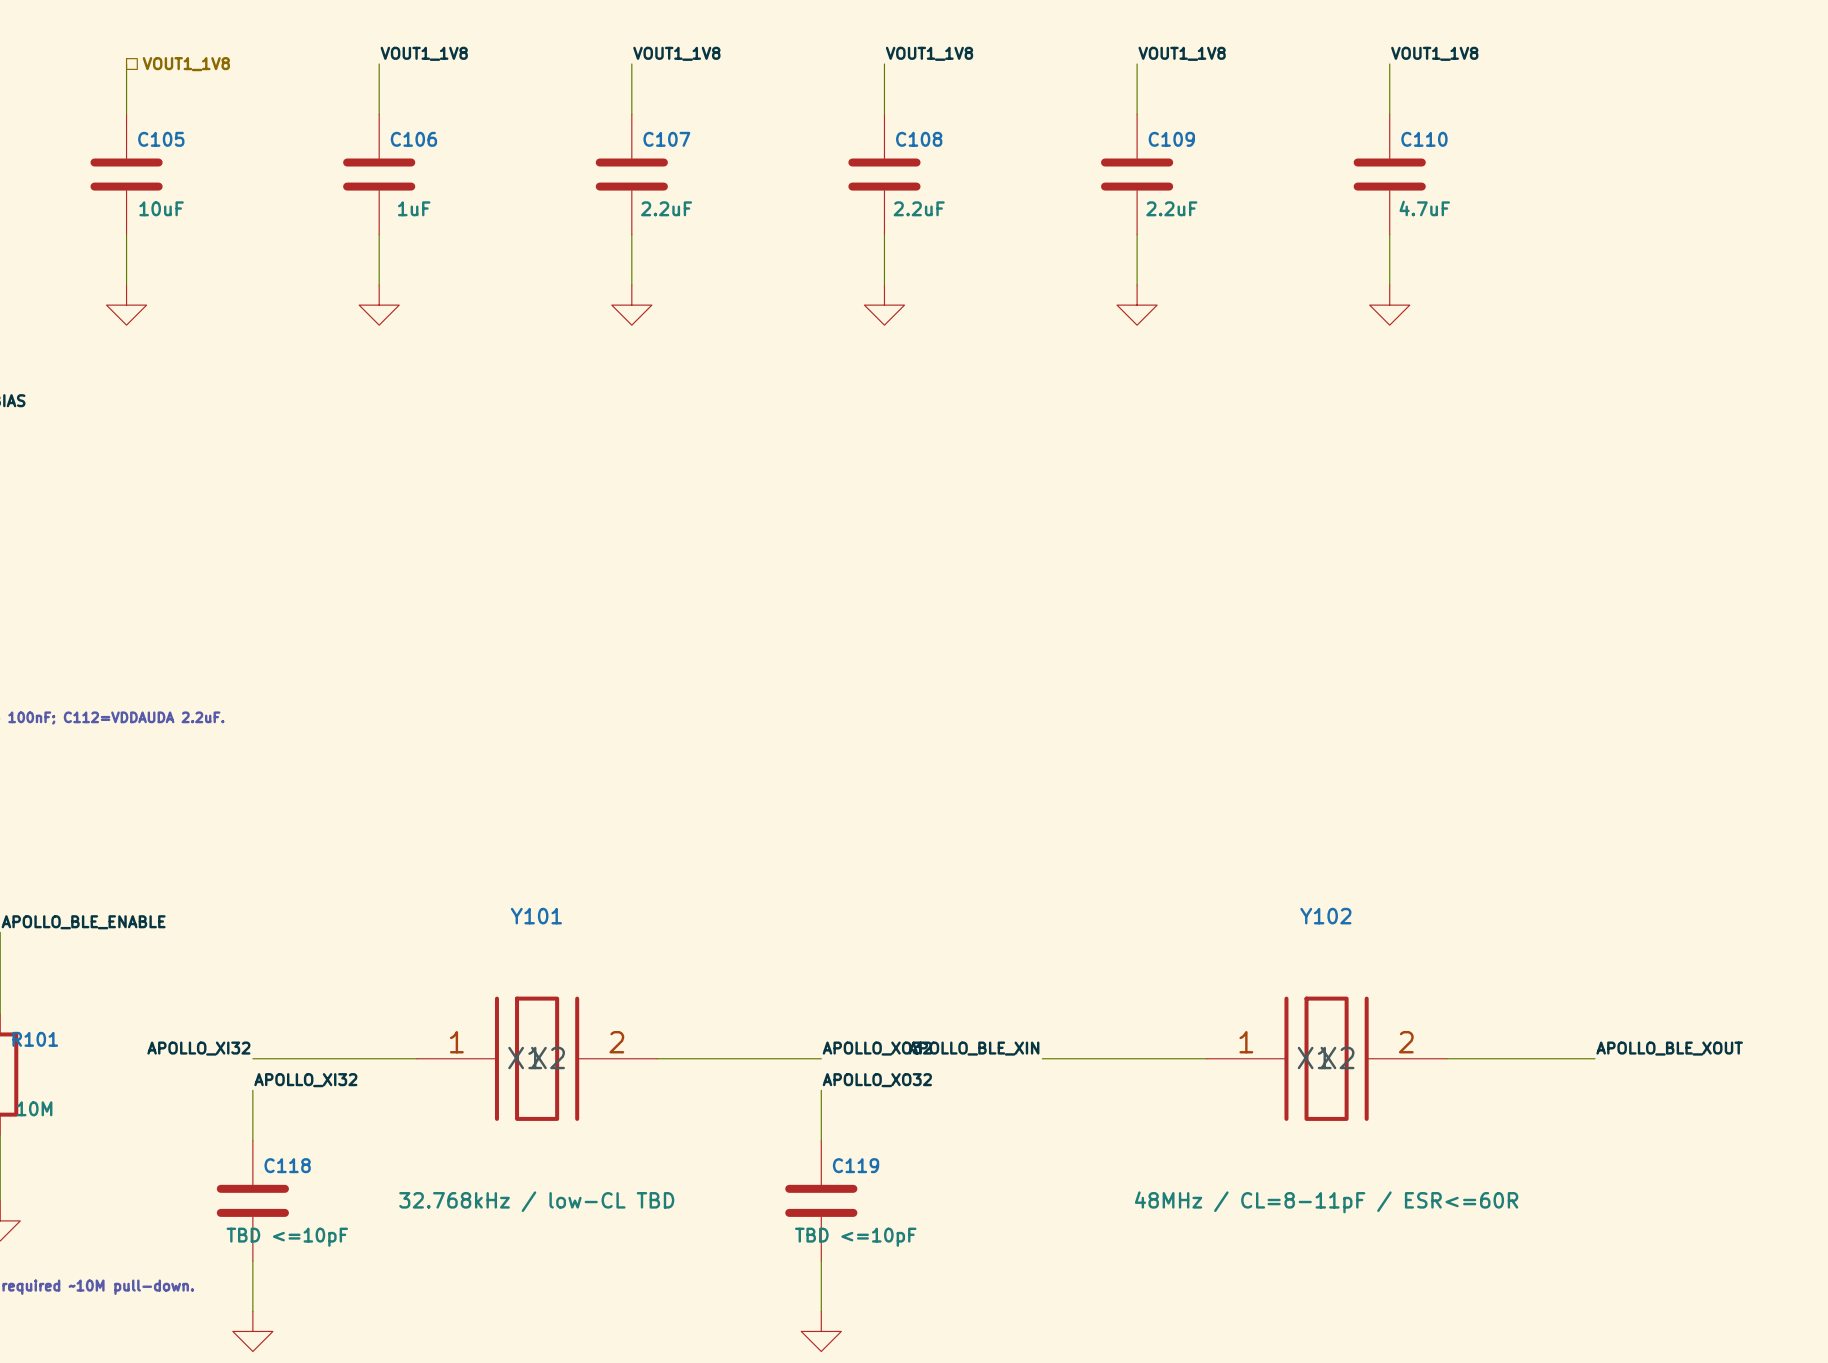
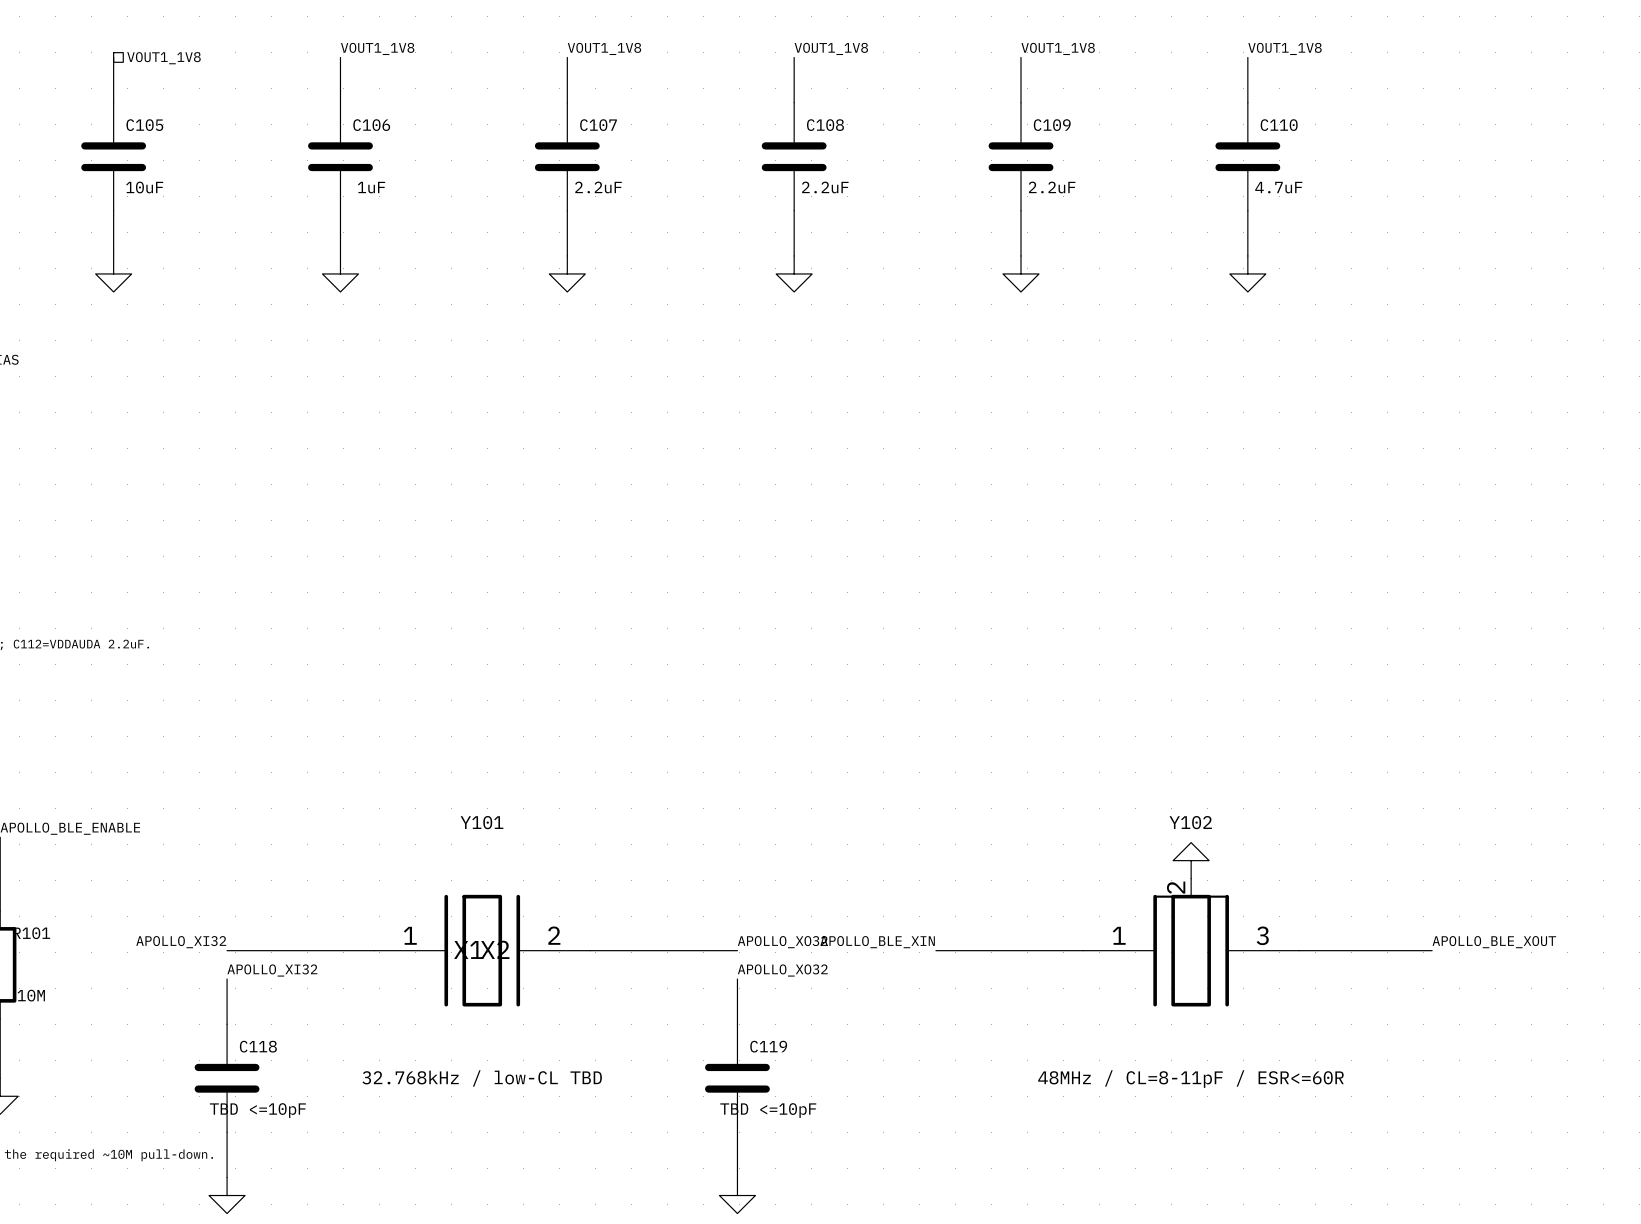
power symbol: none -> (1191, 860)
Y102 symbol: [1206, 996, 1447, 1121] -> [1083, 878, 1300, 1007]

